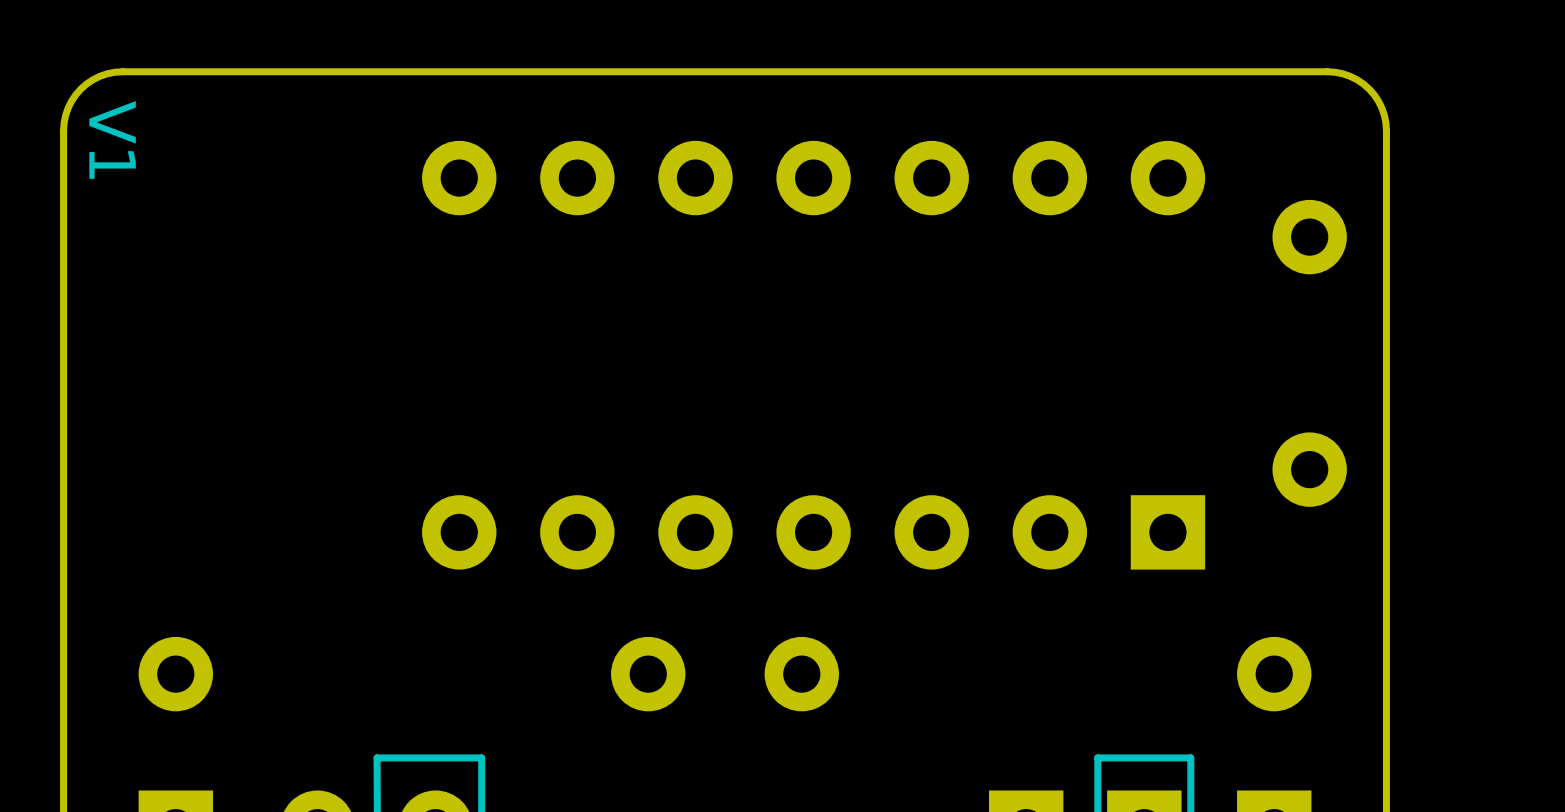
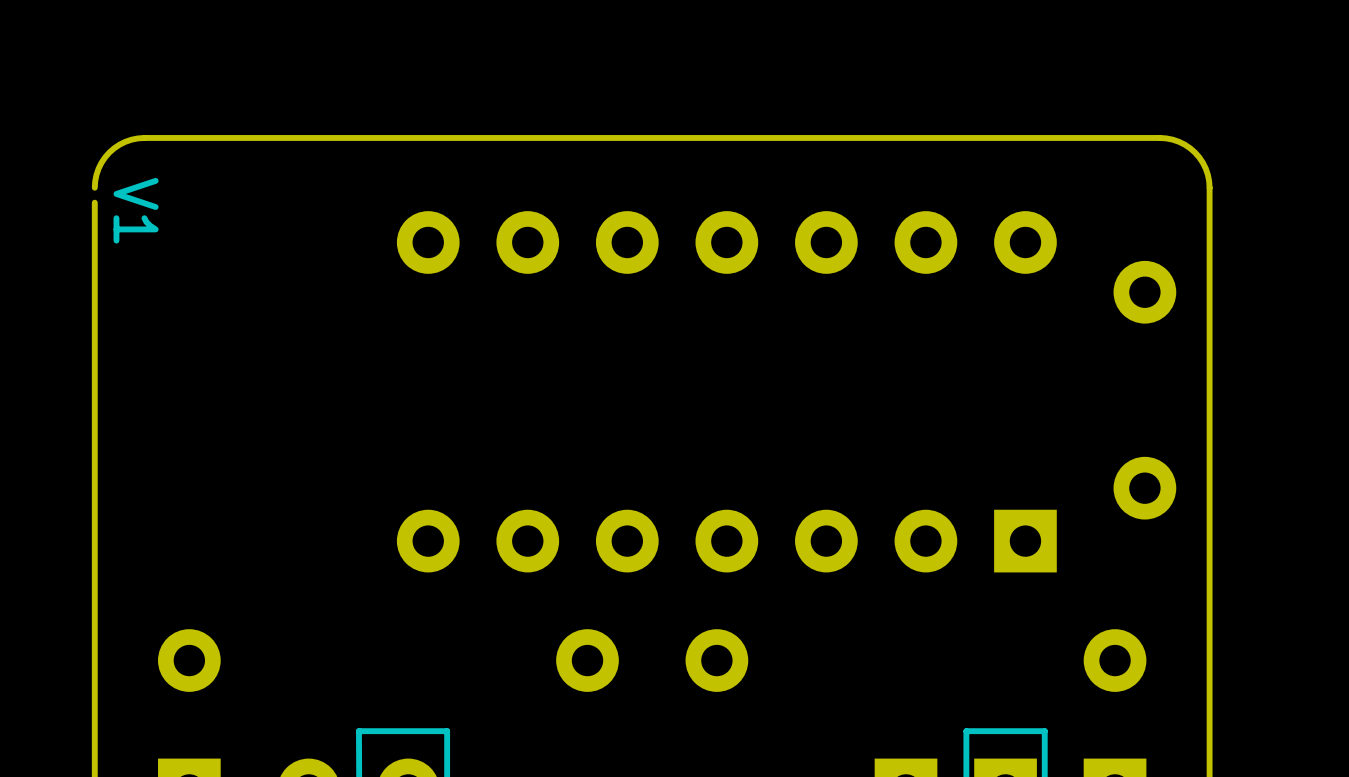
board edge: none -> (1159, 137) (144, 137) (125, 141) (109, 152) (98, 168) (94, 187)
board edge: (1386, 130) (1381, 108) (1369, 89) (1349, 76) (1327, 71) (122, 71) (100, 76) (80, 89) (68, 108) (63, 130) -> (1209, 202) (1207, 174) (1199, 157) (1184, 144) (1172, 139) (1159, 137)

